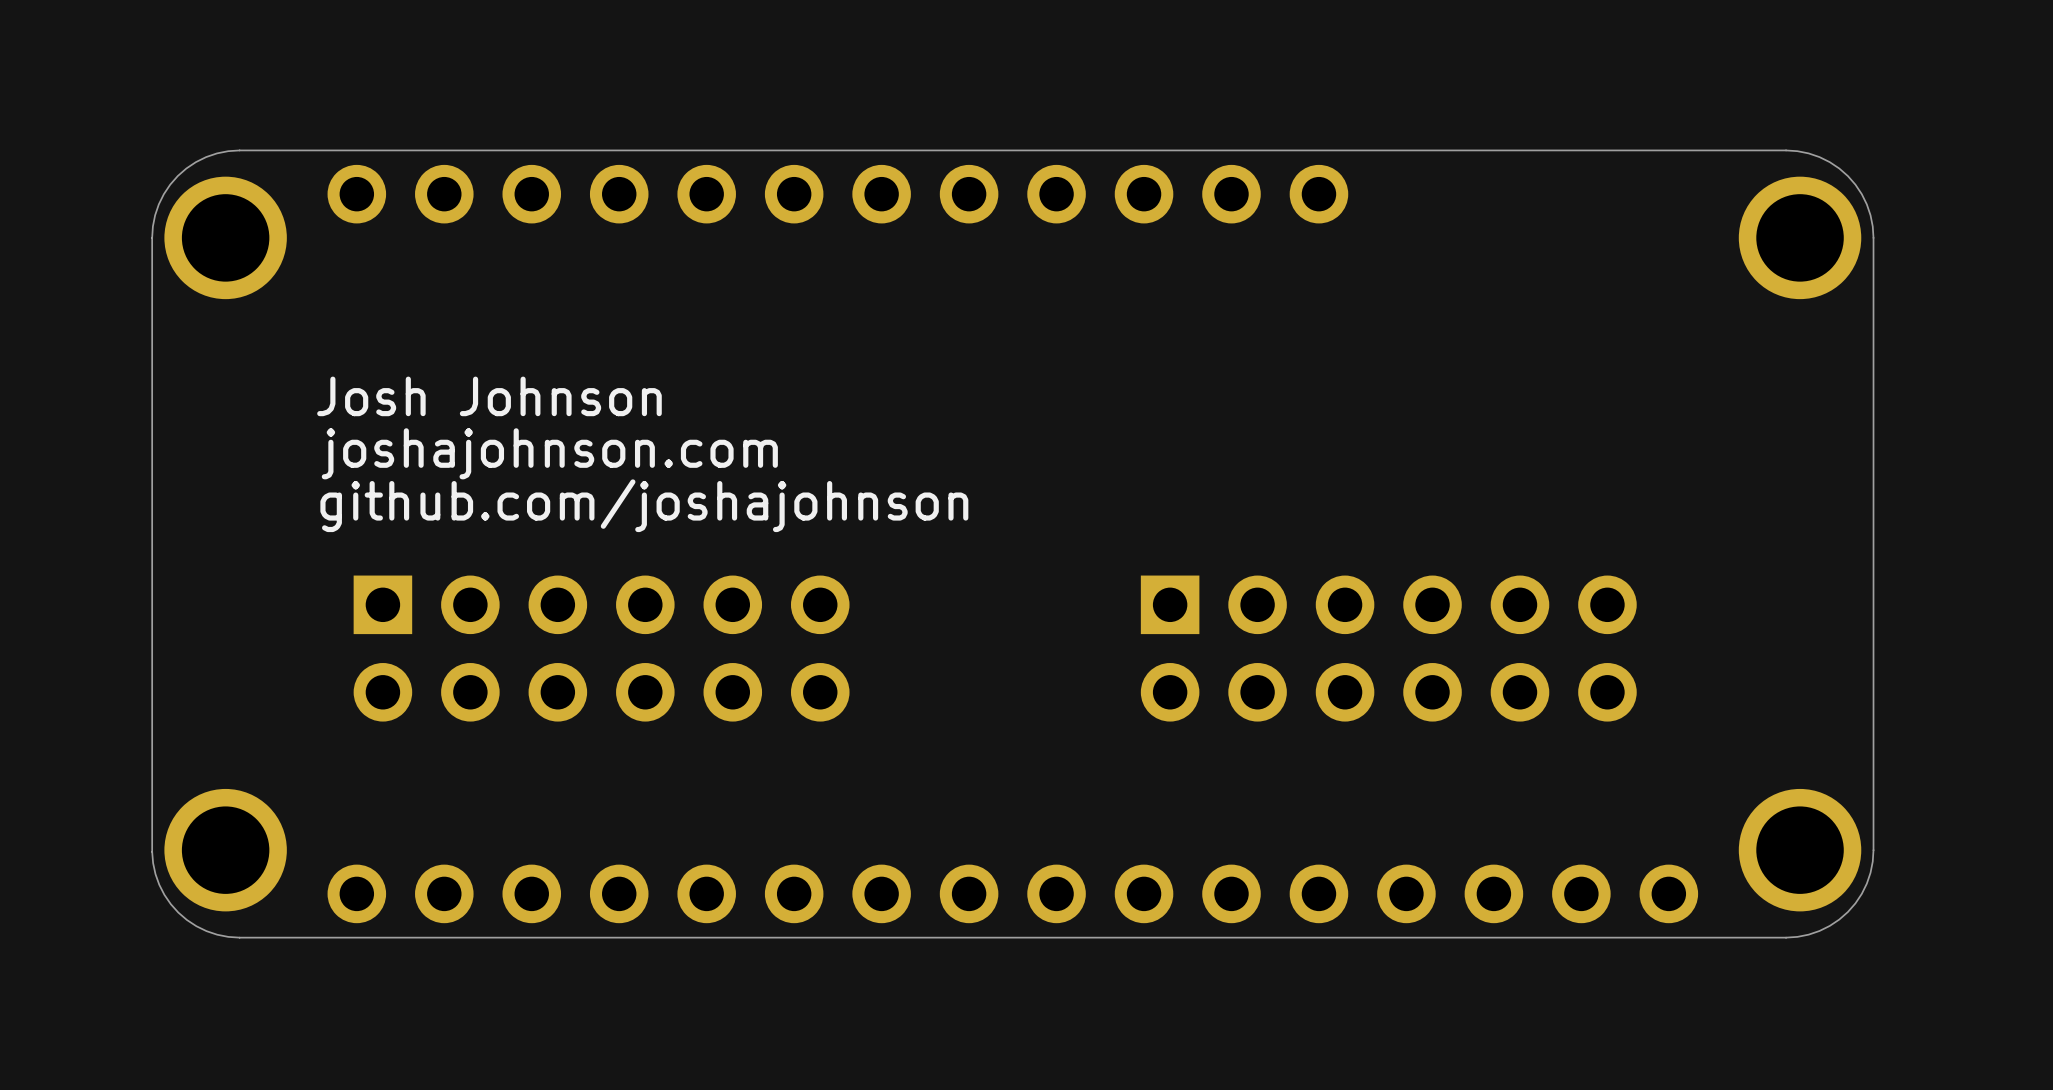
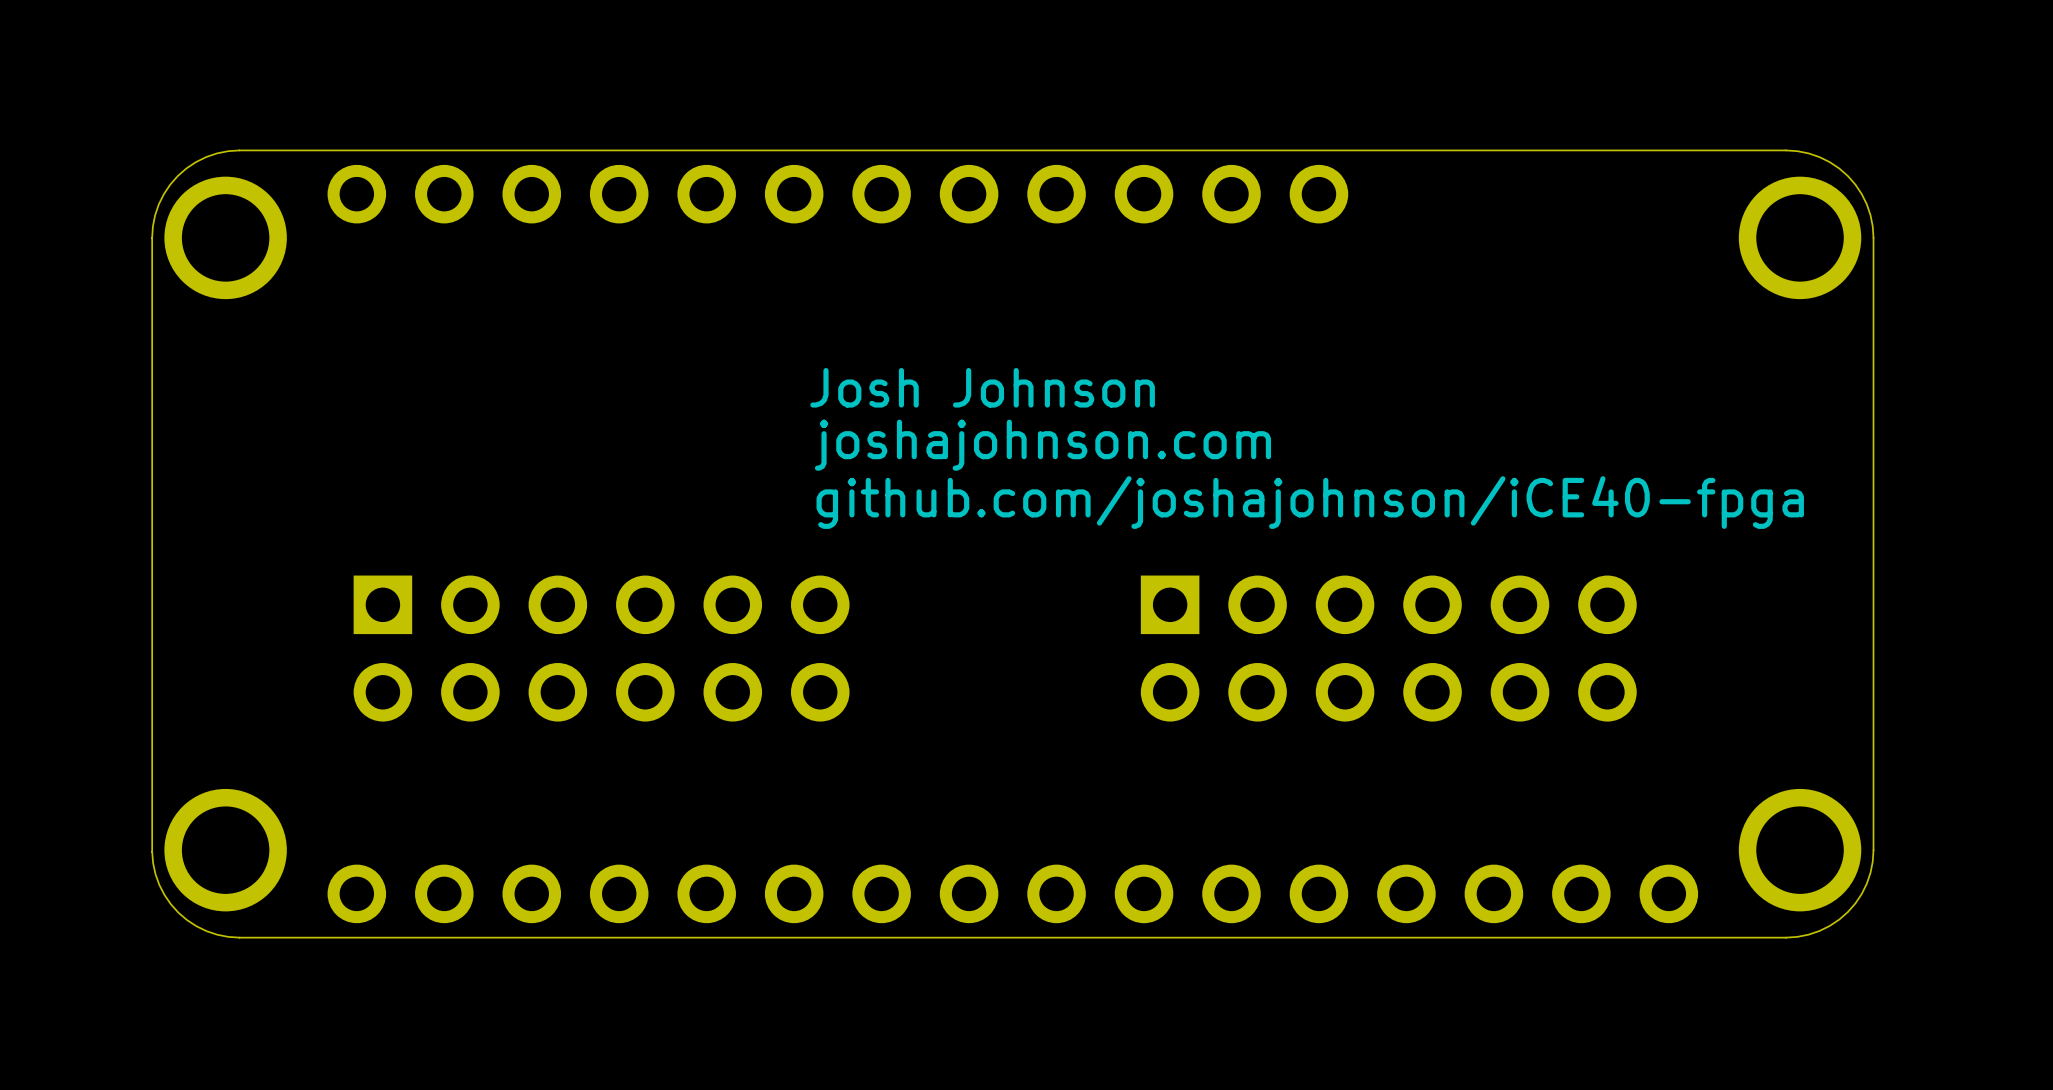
drawing: none -> [810, 367, 1804, 529]
drawing: [317, 376, 969, 533] -> none

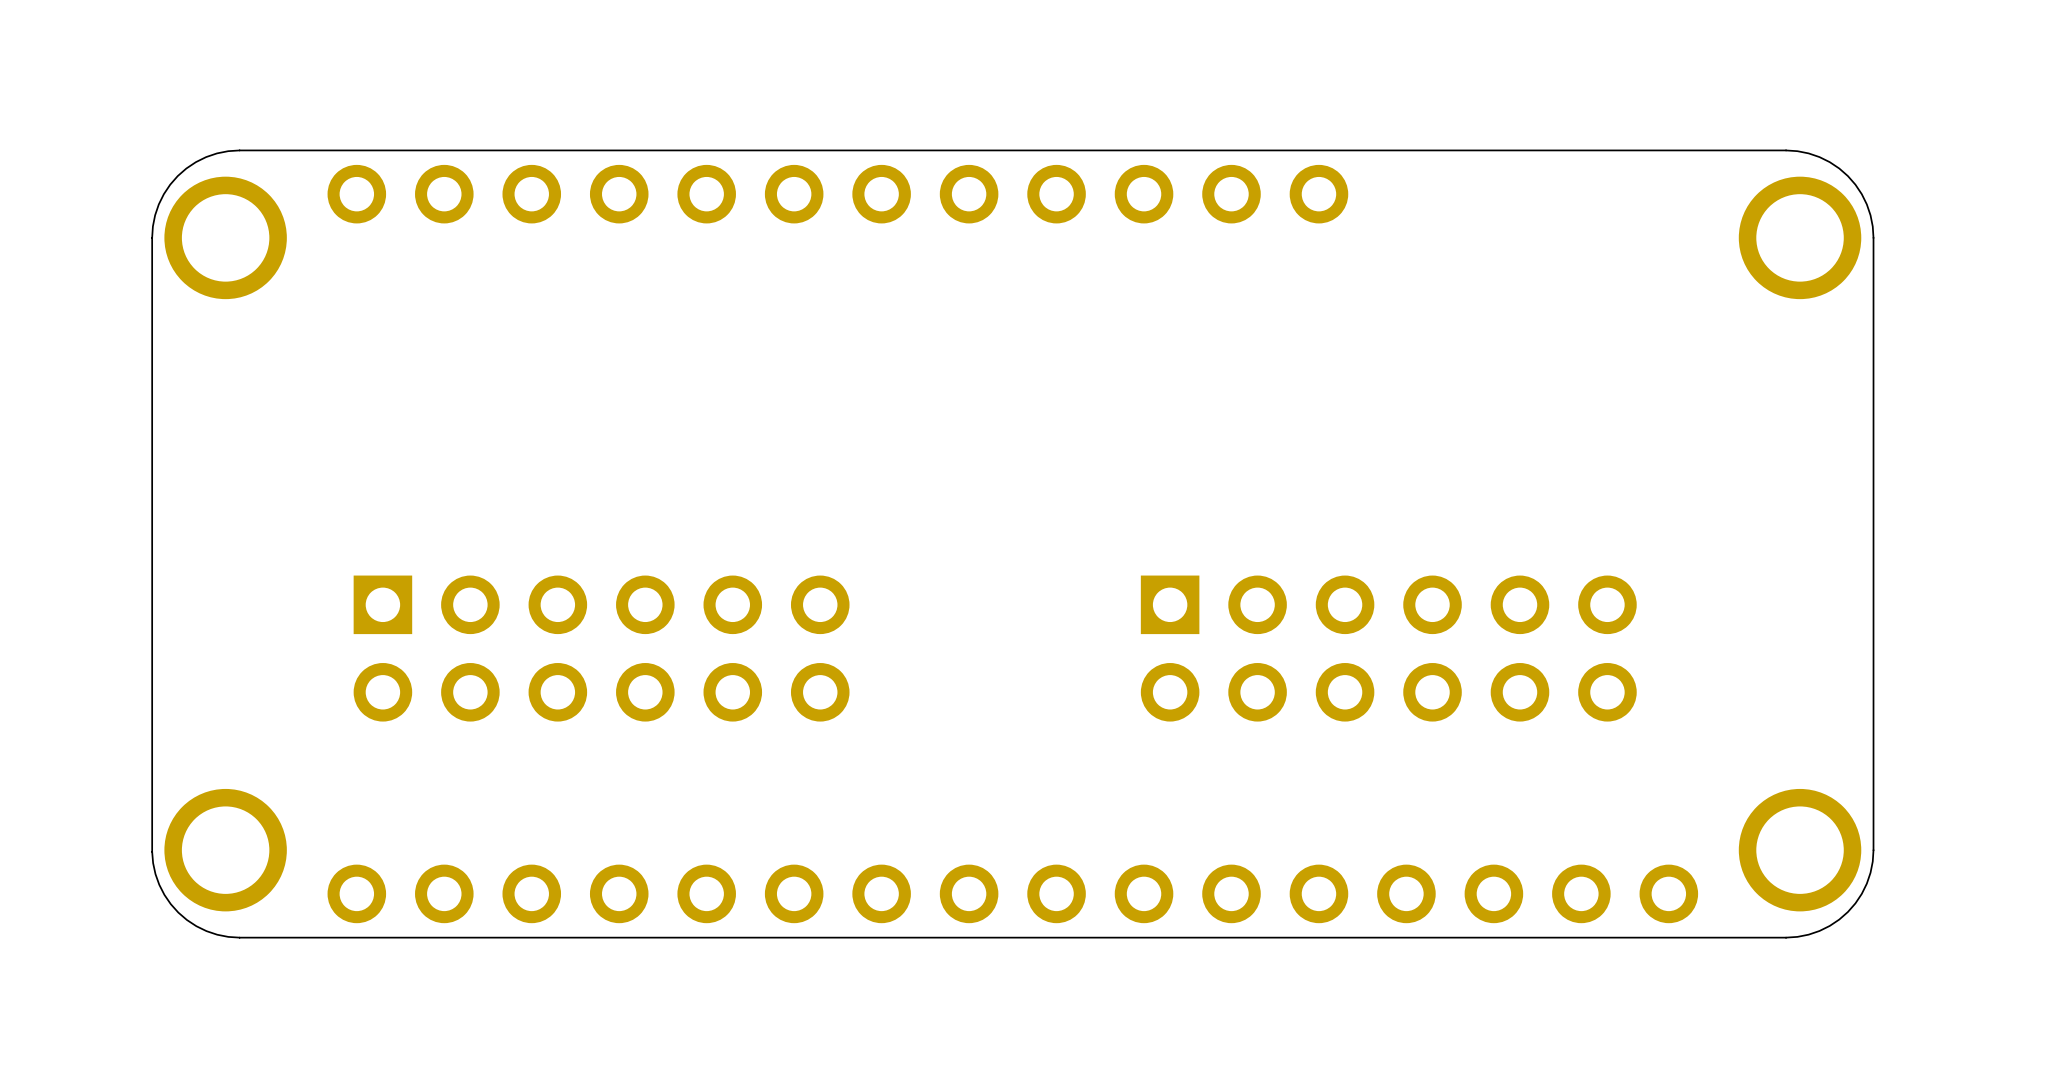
drawing: [810, 367, 1804, 529] -> none

